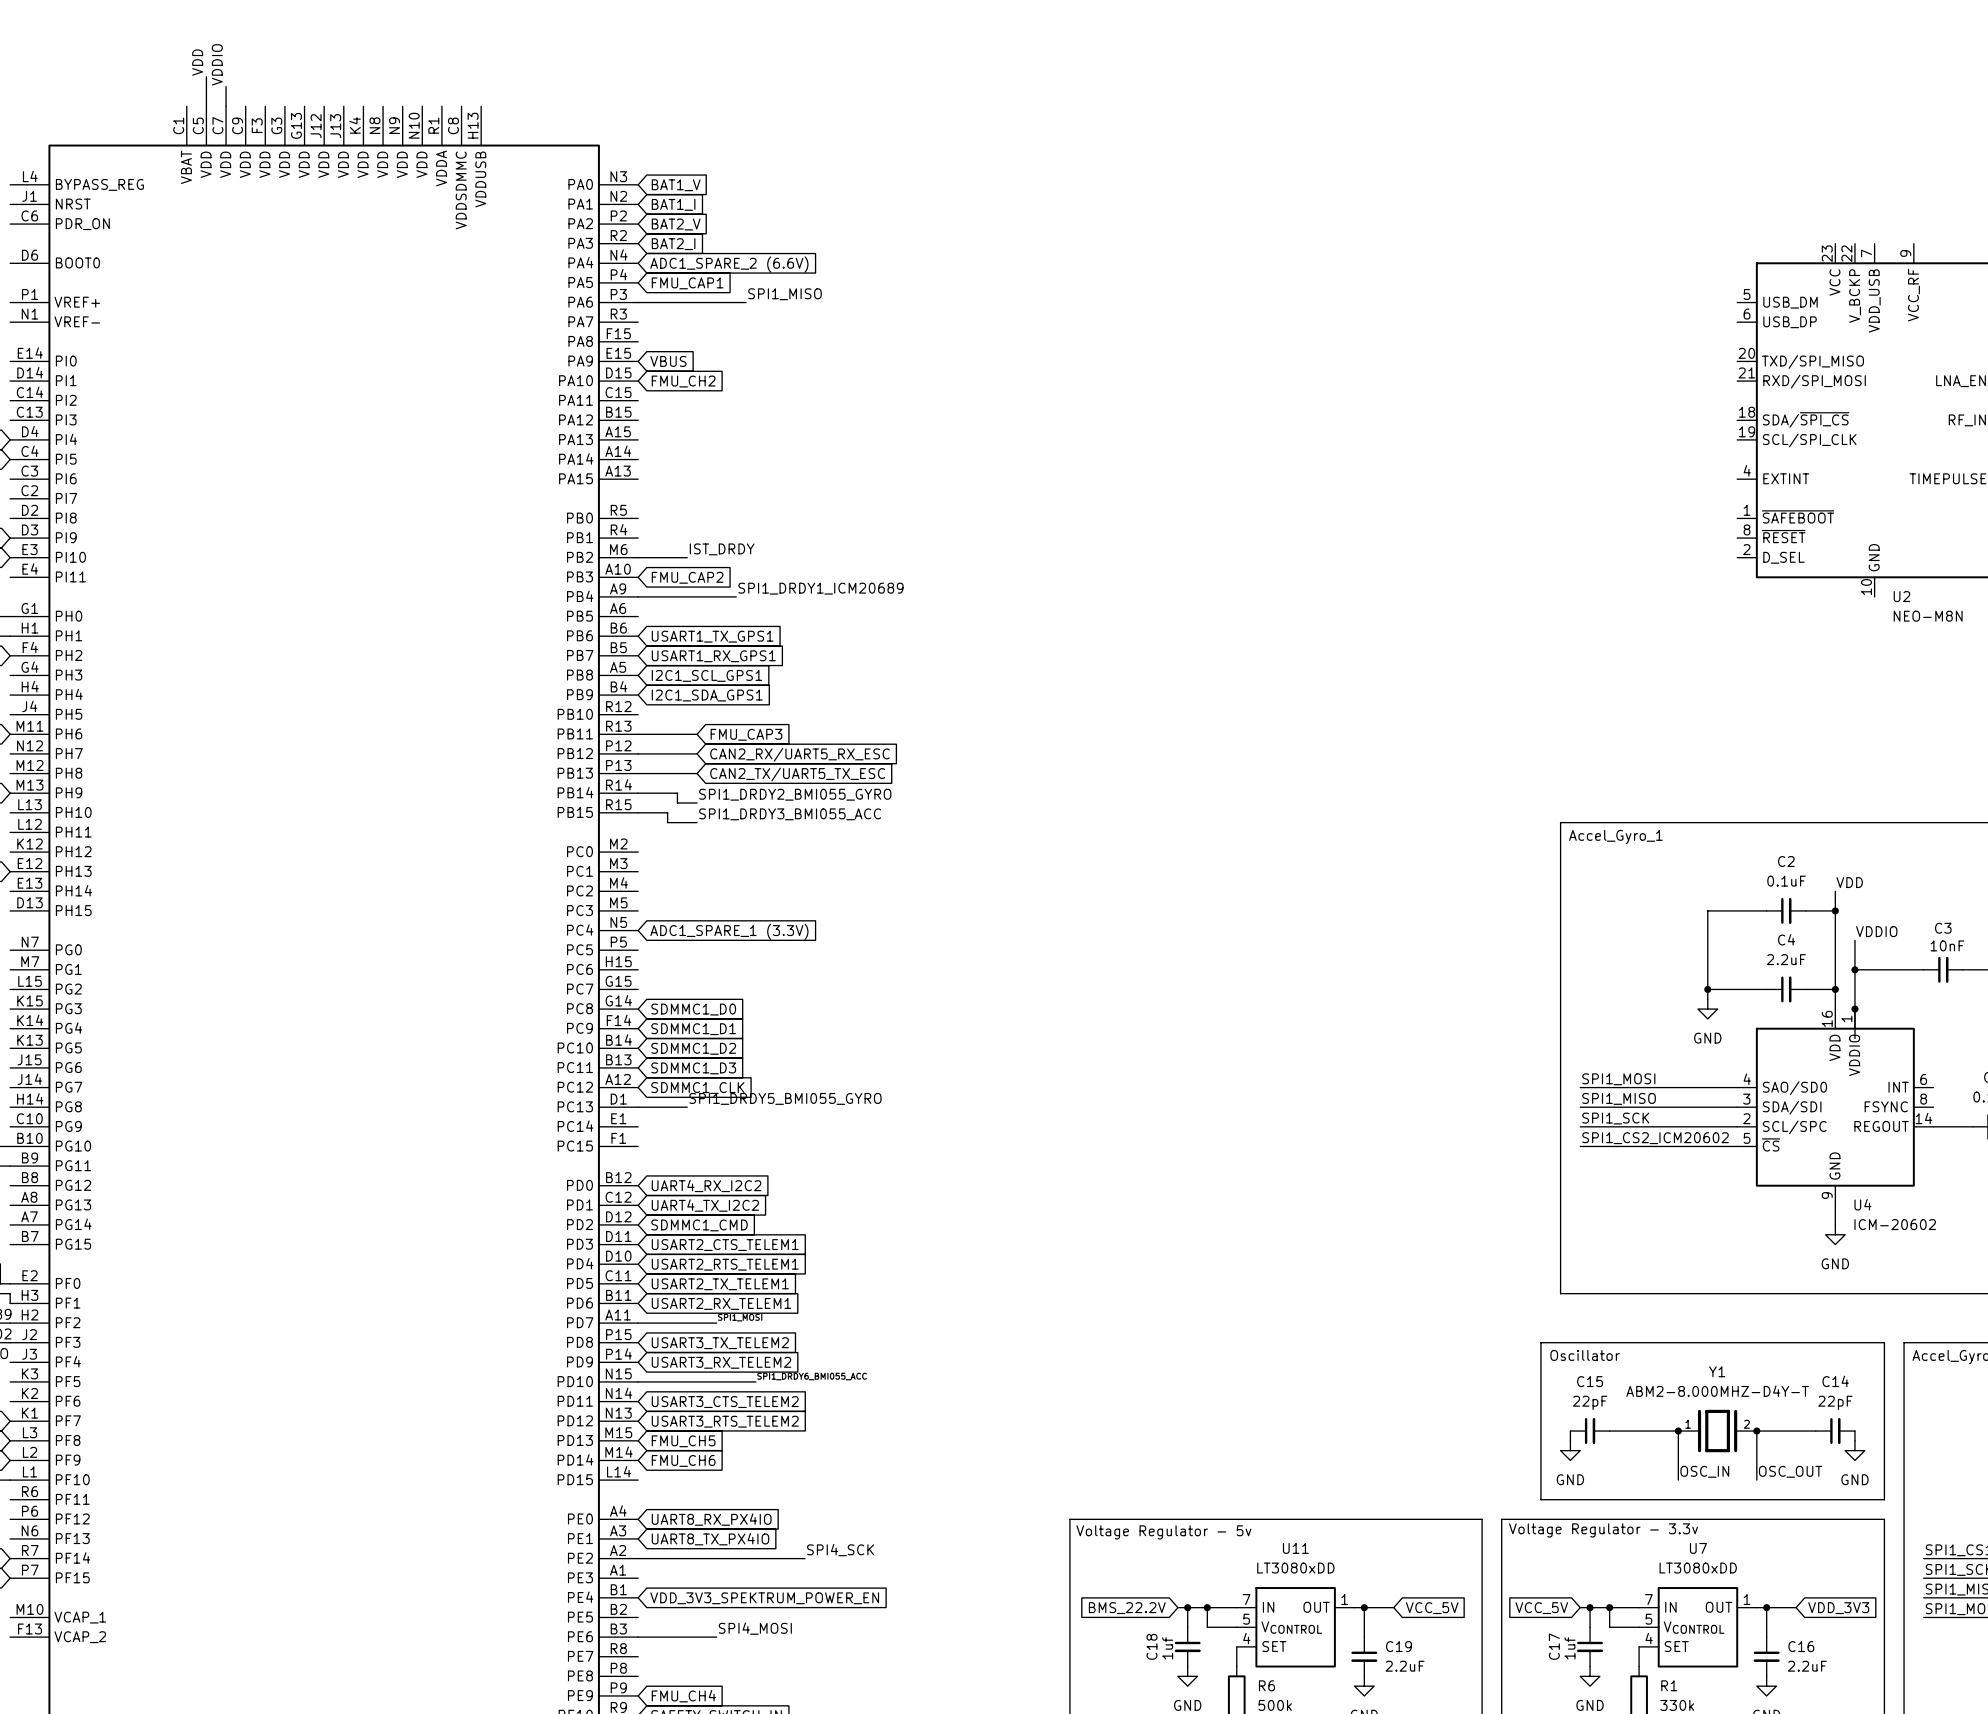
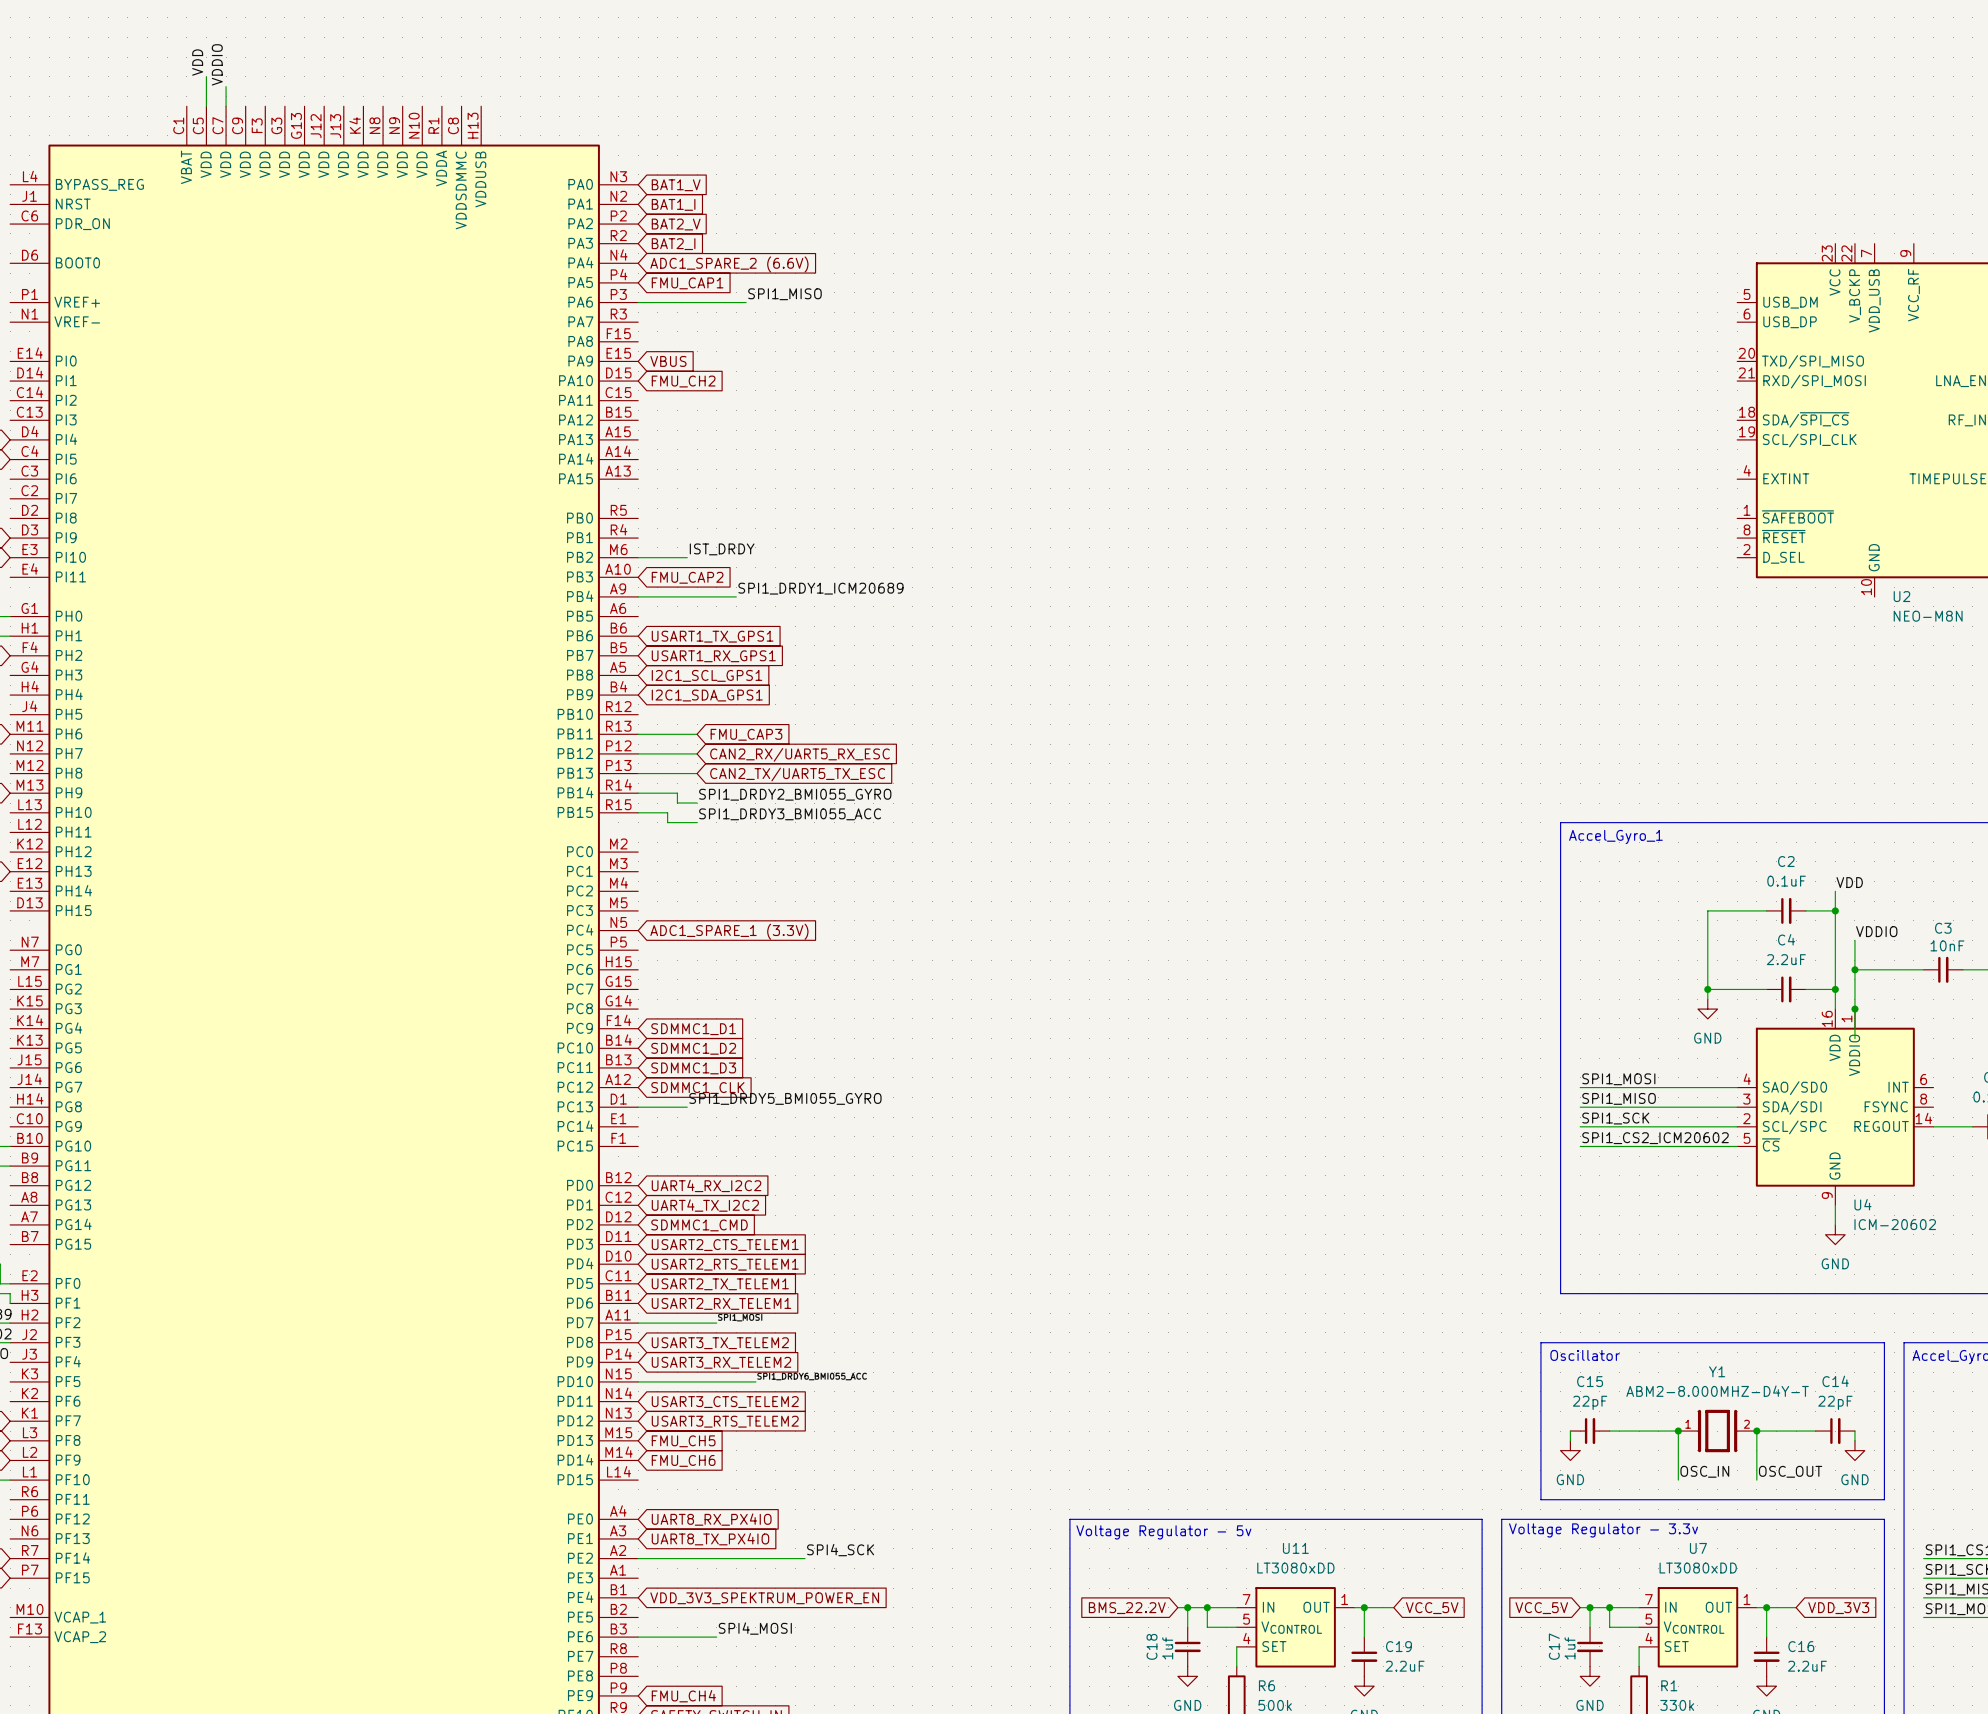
global label: SDMMC1_D0 (693, 1009) -> none

